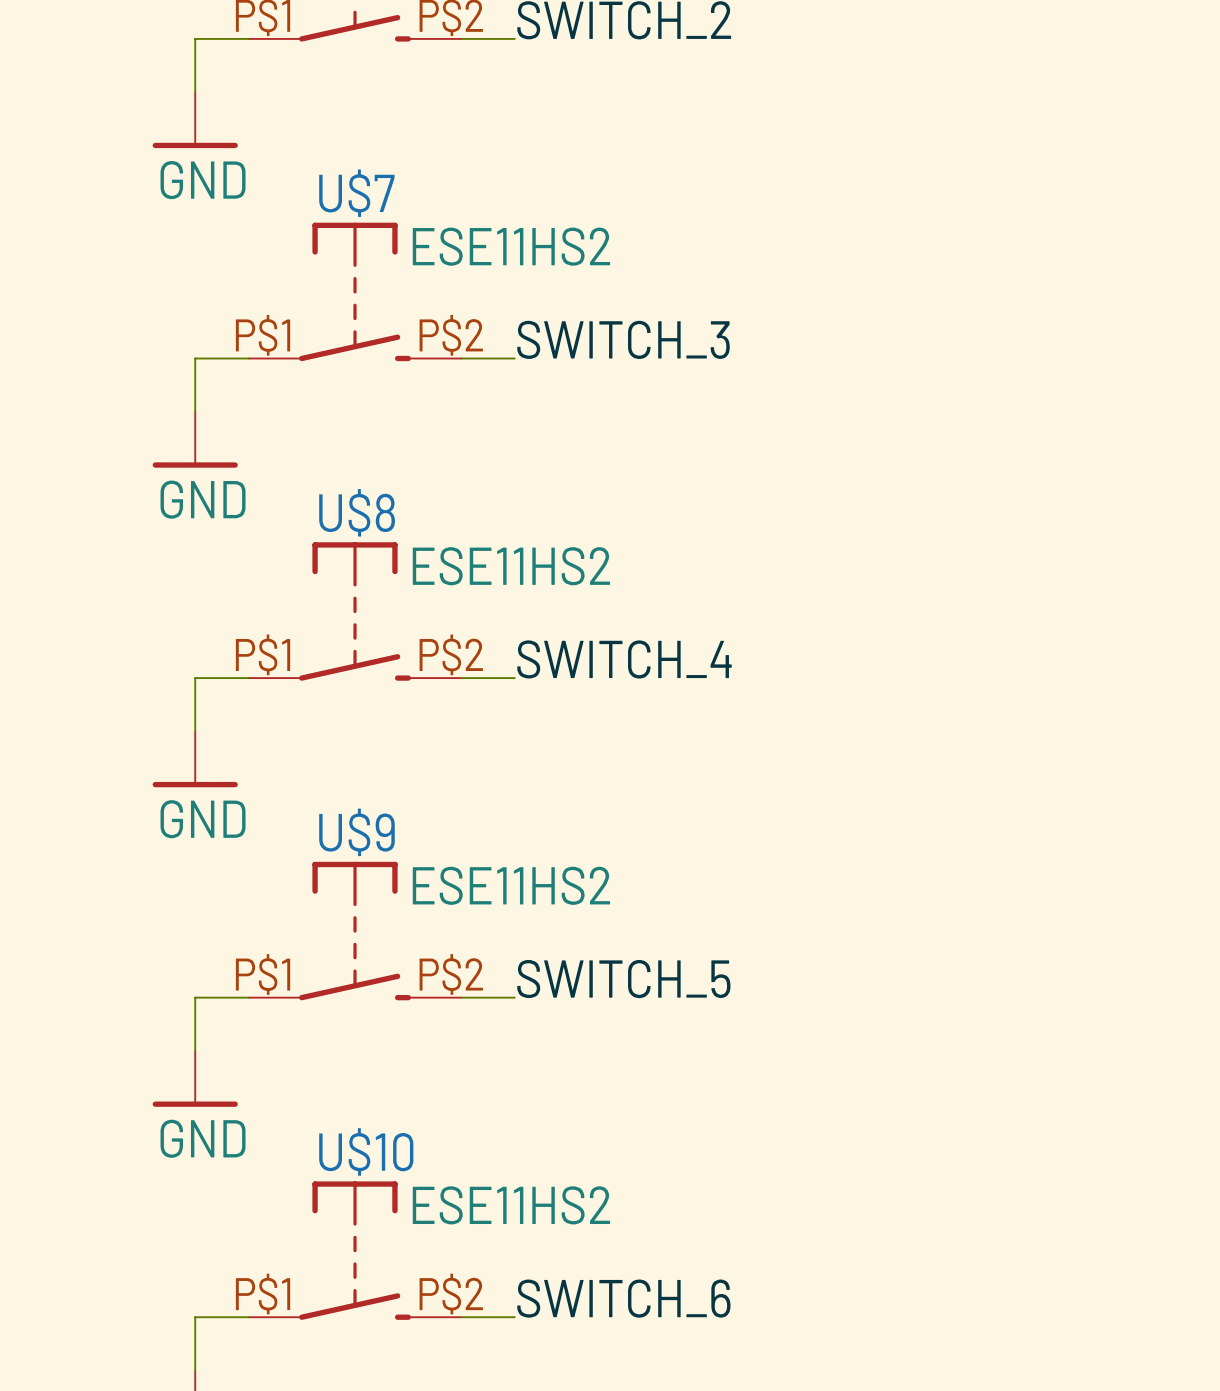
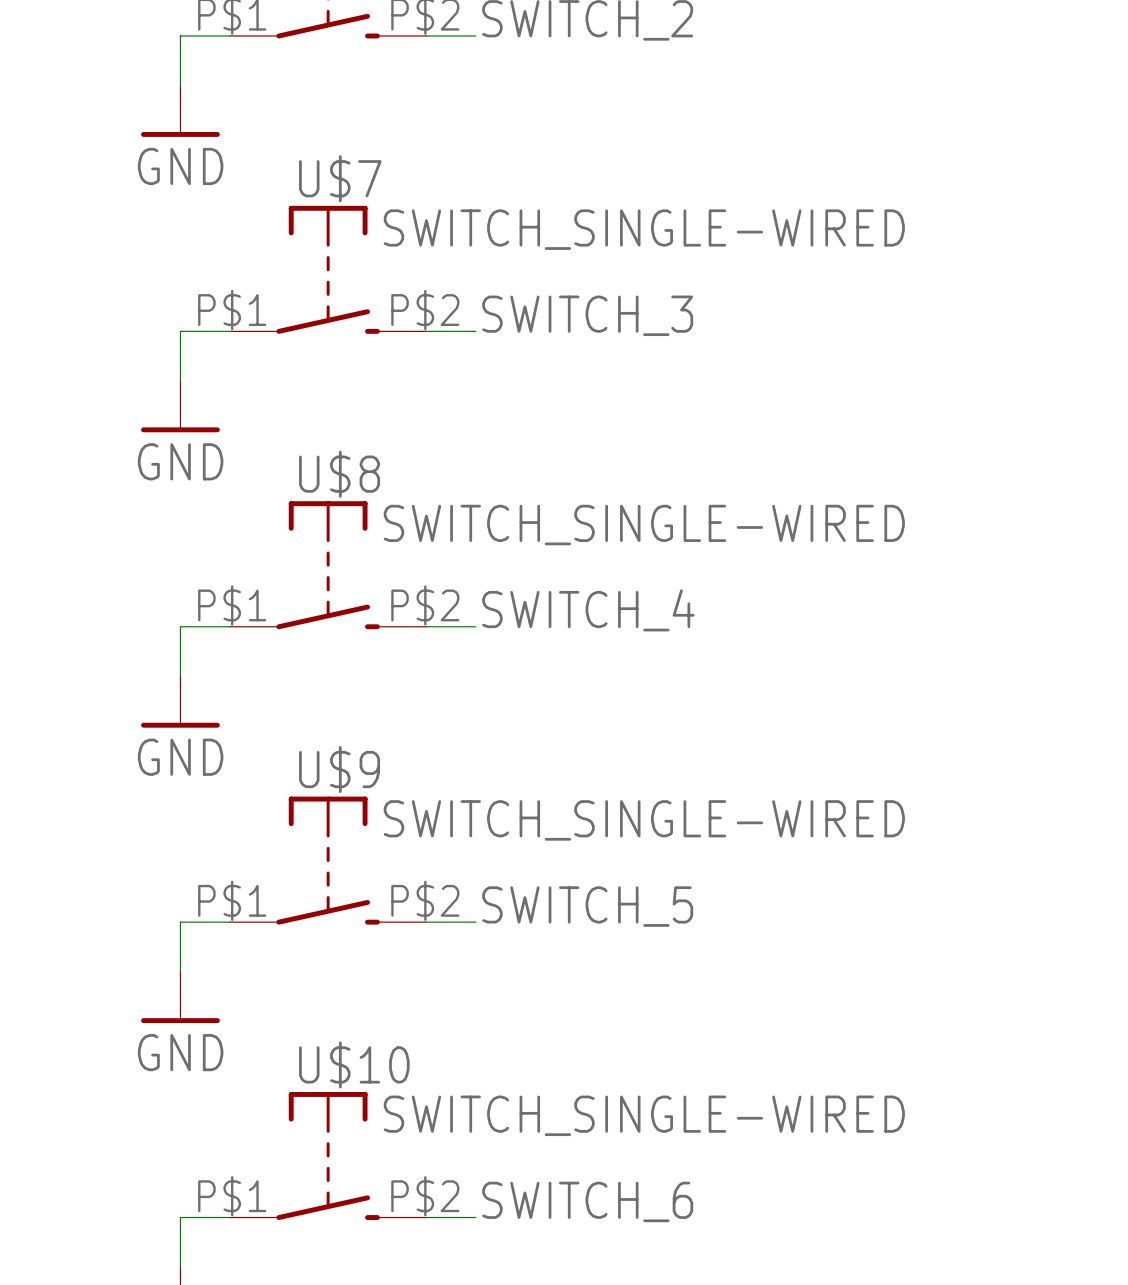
U$7 value: ESE11HS2 (511, 246) -> SWITCH_SINGLE-WIRED (644, 229)
U$8 value: ESE11HS2 (511, 566) -> SWITCH_SINGLE-WIRED (644, 525)
U$9 value: ESE11HS2 (511, 885) -> SWITCH_SINGLE-WIRED (644, 820)
U$10 value: ESE11HS2 (511, 1205) -> SWITCH_SINGLE-WIRED (644, 1115)

